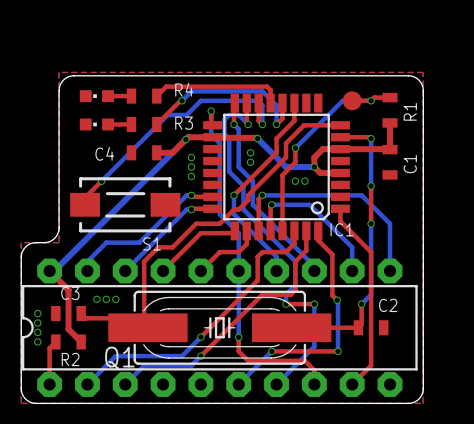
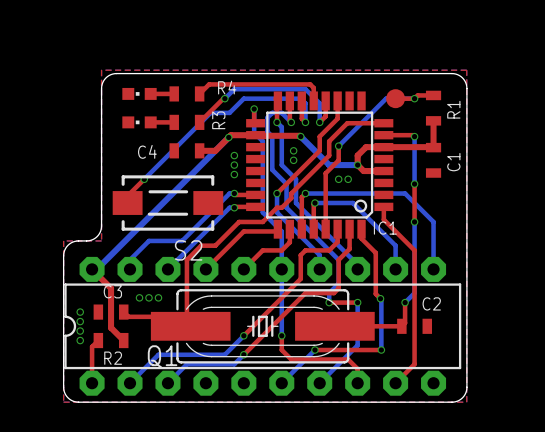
R3 name rotation: 0° (184, 123) -> 90° counterclockwise (218, 120)
S1 name: S1 (152, 243) -> S2 (188, 250)

